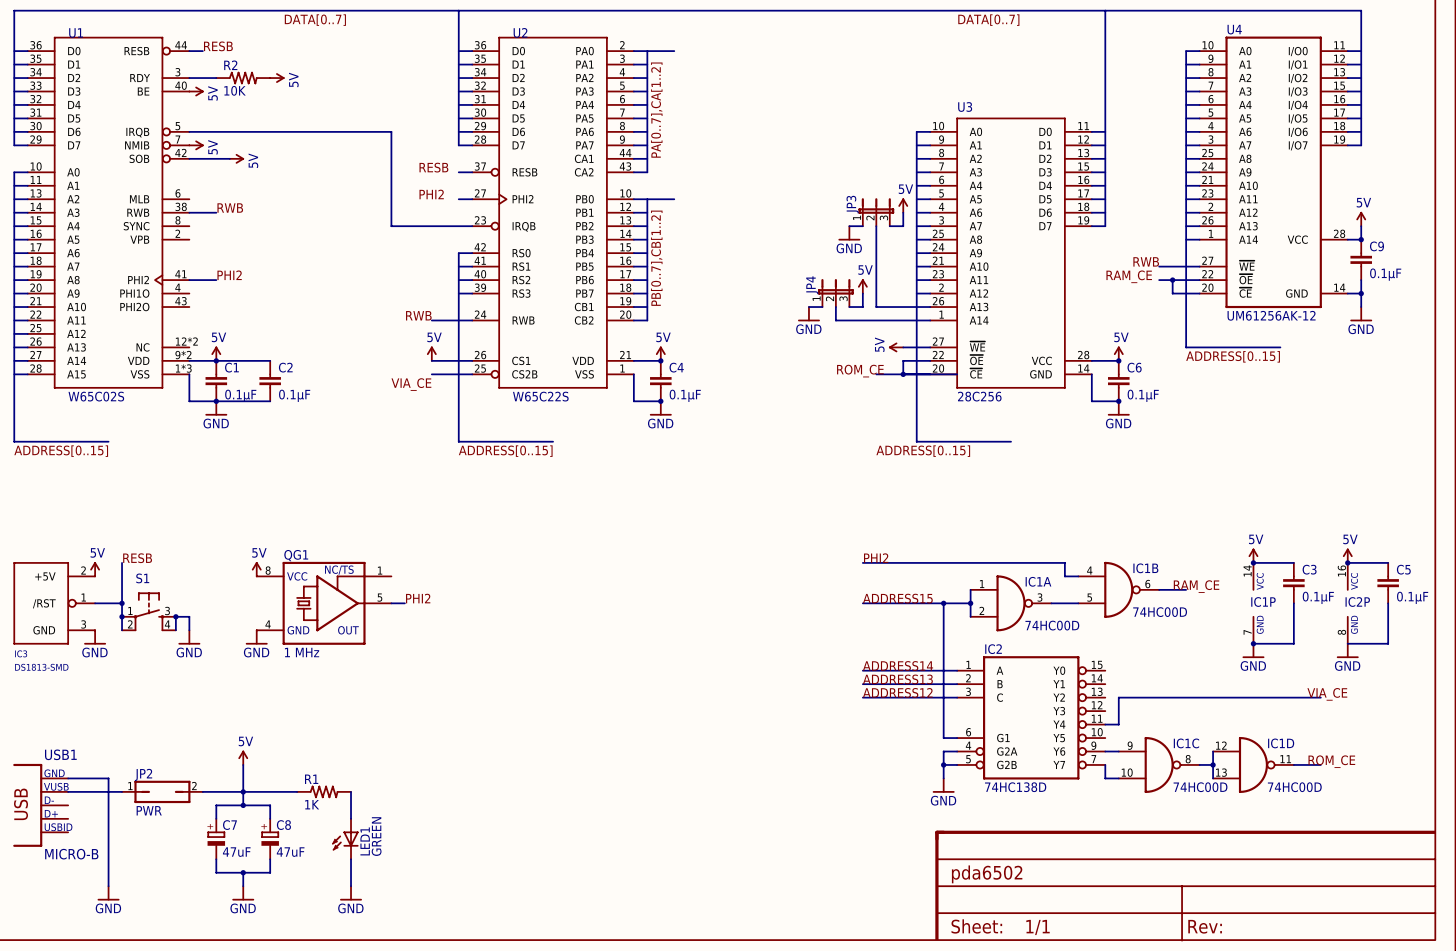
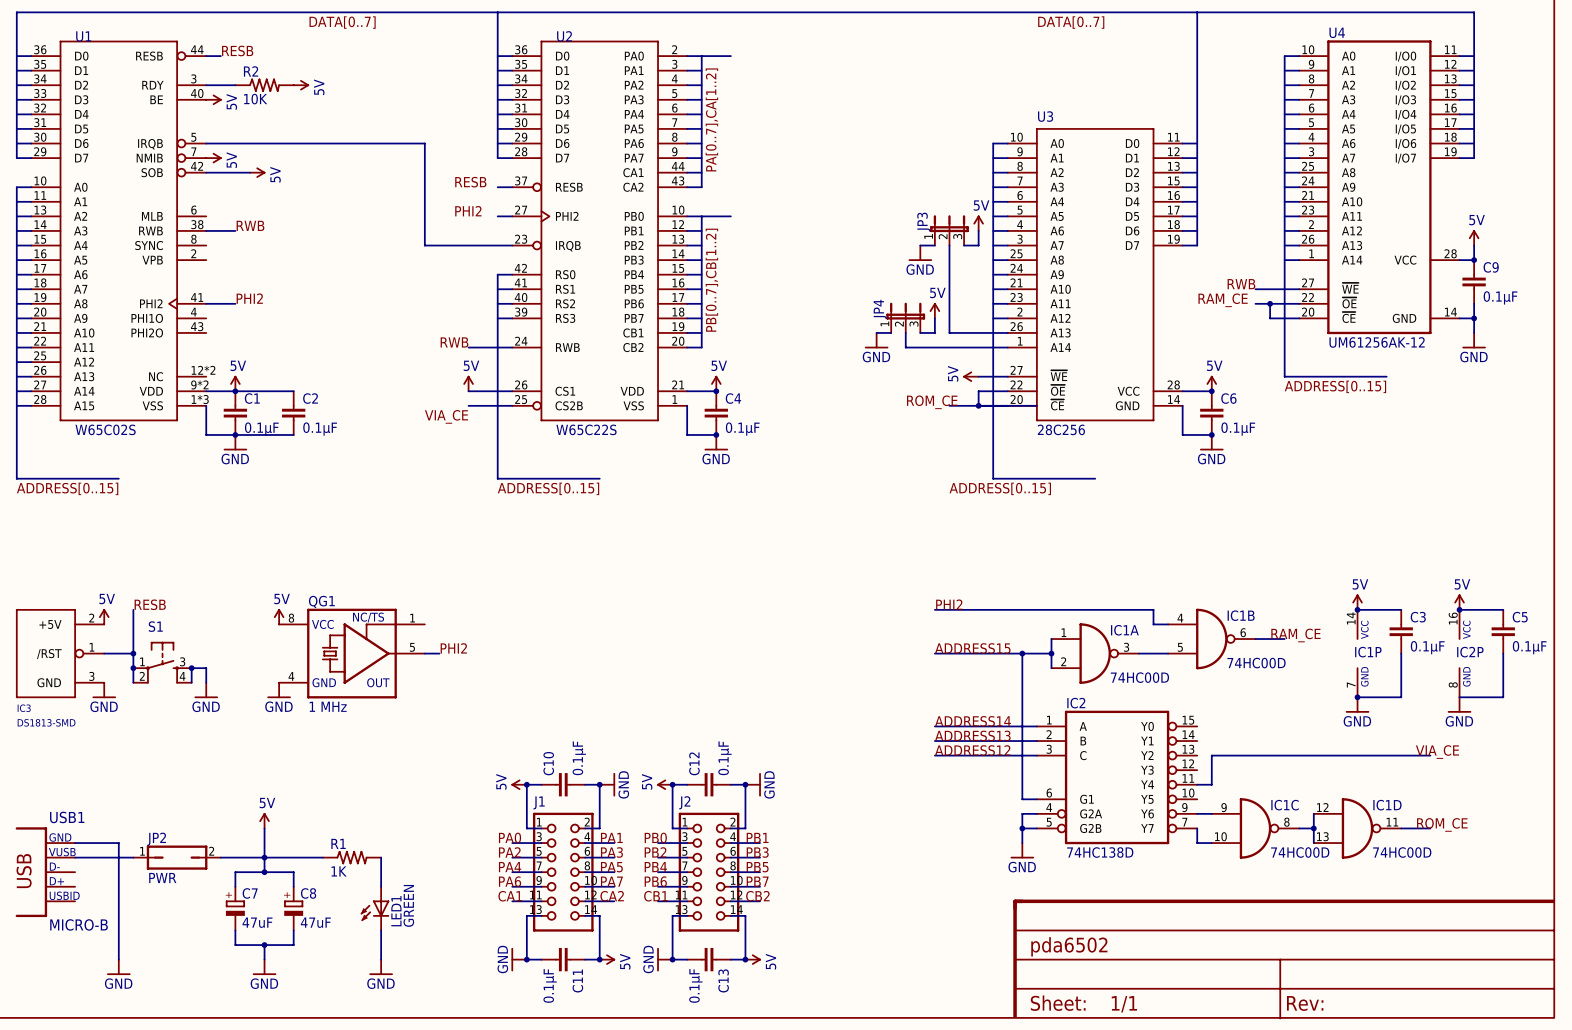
power symbol: none -> 5V (519, 784)
junction: none -> (526, 784)
wire: none -> (541, 784) (526, 784) (526, 828) (541, 828)
C10: none -> 0.1μF (563, 784)
wire: none -> (585, 784) (599, 784) (599, 828) (585, 828)
junction: none -> (599, 784)
power symbol: none -> GND (607, 784)
power symbol: none -> 5V (664, 784)
junction: none -> (672, 784)
wire: none -> (687, 784) (672, 784) (672, 828) (687, 828)
C12: none -> 0.1μF (709, 784)
wire: none -> (730, 784) (745, 784) (745, 828) (730, 828)
junction: none -> (745, 784)
power symbol: none -> GND (753, 784)
label: none -> PA0 (510, 837)
label: none -> PA1 (611, 837)
label: none -> PB0 (655, 837)
label: none -> PB1 (757, 837)
wire: none -> (512, 843) (541, 843)
wire: none -> (585, 843) (614, 843)
wire: none -> (658, 843) (687, 843)
wire: none -> (730, 843) (760, 843)
label: none -> PA2 (509, 852)
label: none -> PA3 (611, 852)
label: none -> PB2 (655, 852)
label: none -> PB3 (757, 852)
wire: none -> (512, 857) (541, 857)
wire: none -> (585, 857) (614, 857)
wire: none -> (658, 857) (687, 857)
wire: none -> (730, 857) (760, 857)
label: none -> PA4 (510, 867)
label: none -> PA5 (611, 867)
label: none -> PB4 (655, 867)
label: none -> PB5 (757, 867)
wire: none -> (512, 872) (541, 872)
J1: none -> (563, 872)
wire: none -> (585, 872) (614, 872)
wire: none -> (658, 872) (687, 872)
J2: none -> (709, 872)
wire: none -> (730, 872) (760, 872)
label: none -> PA6 (510, 881)
label: none -> PA7 (611, 881)
label: none -> PB6 (655, 881)
label: none -> PB7 (757, 881)
wire: none -> (512, 886) (541, 886)
wire: none -> (585, 886) (614, 886)
wire: none -> (658, 886) (687, 886)
wire: none -> (730, 886) (760, 886)
label: none -> CA1 (510, 896)
label: none -> CA2 (612, 896)
label: none -> CB1 (655, 896)
label: none -> CB2 (757, 896)
wire: none -> (512, 901) (541, 901)
wire: none -> (585, 901) (614, 901)
wire: none -> (658, 901) (687, 901)
wire: none -> (730, 901) (760, 901)
wire: none -> (541, 915) (526, 915) (526, 959) (541, 959)
wire: none -> (585, 915) (599, 915) (599, 959) (585, 959)
wire: none -> (687, 915) (672, 915) (672, 959) (687, 959)
wire: none -> (730, 915) (745, 915) (745, 959) (730, 959)
power symbol: none -> GND (519, 959)
junction: none -> (526, 959)
C11: none -> 0.1μF (563, 959)
junction: none -> (599, 959)
power symbol: none -> 5V (607, 959)
power symbol: none -> GND (664, 959)
junction: none -> (672, 959)
C13: none -> 0.1μF (709, 959)
junction: none -> (745, 959)
power symbol: none -> 5V (753, 959)

